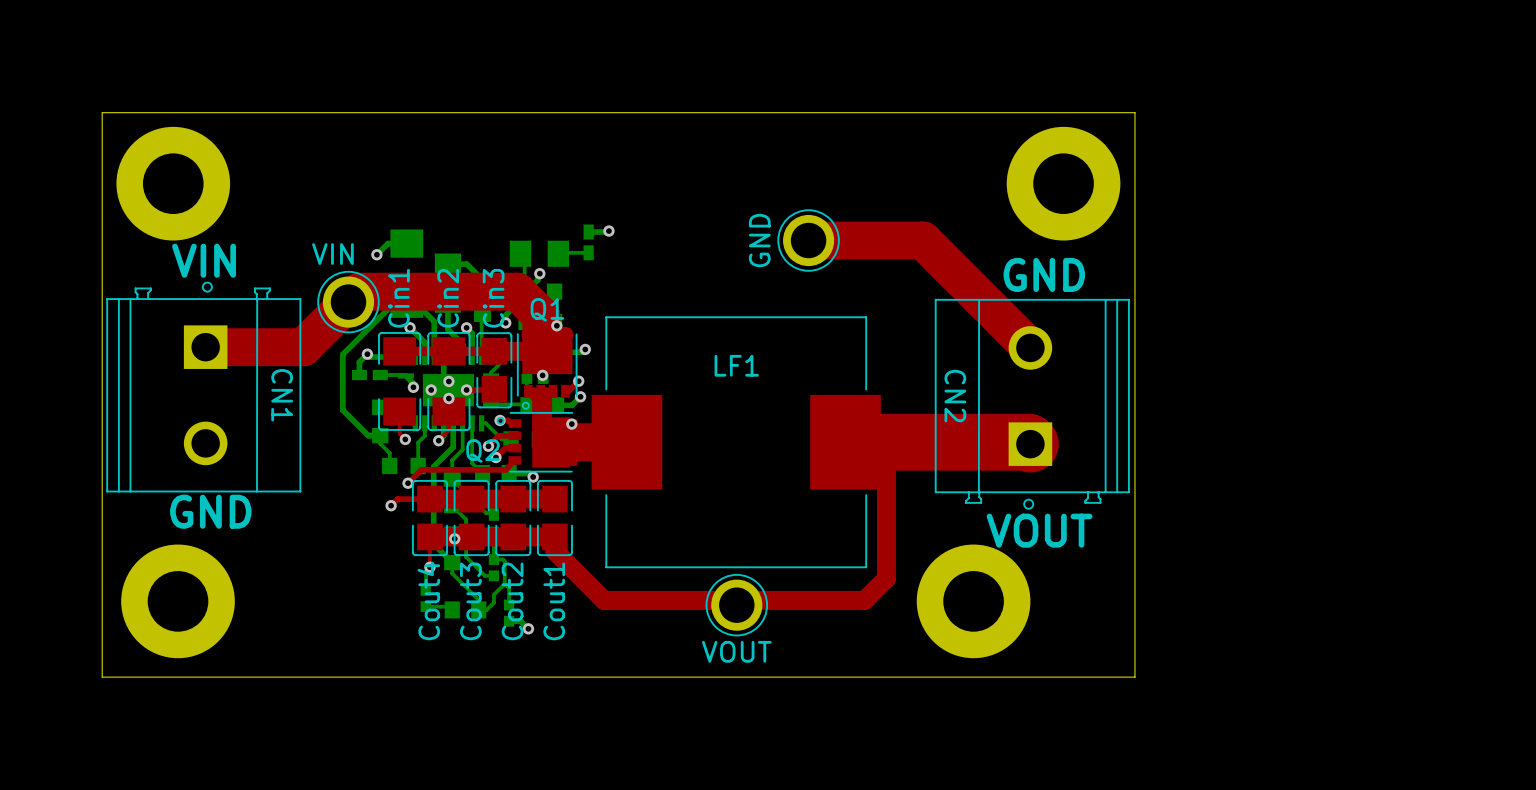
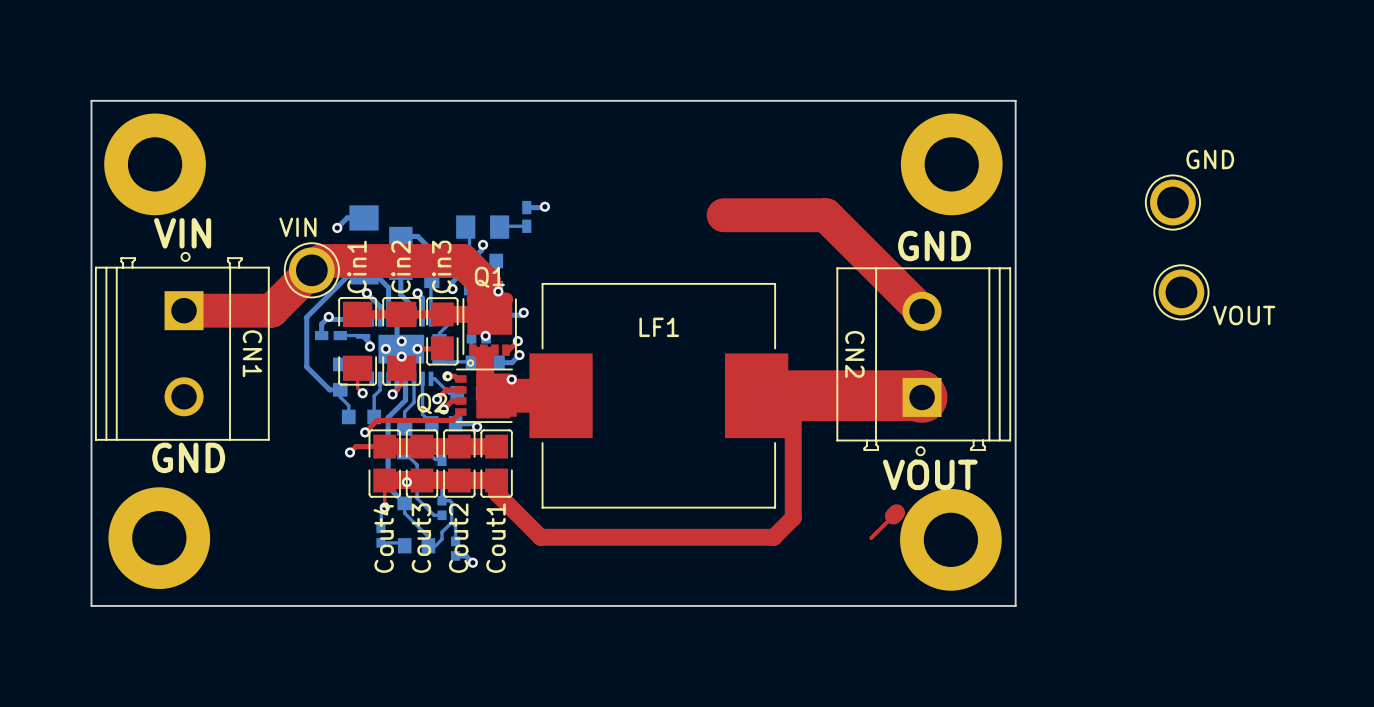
GND: none -> (1172, 202)
GND: (808, 240) -> none
VOUT: none -> (1181, 292)
part position: (973, 601) -> (950, 539)
VOUT: (736, 605) -> none

